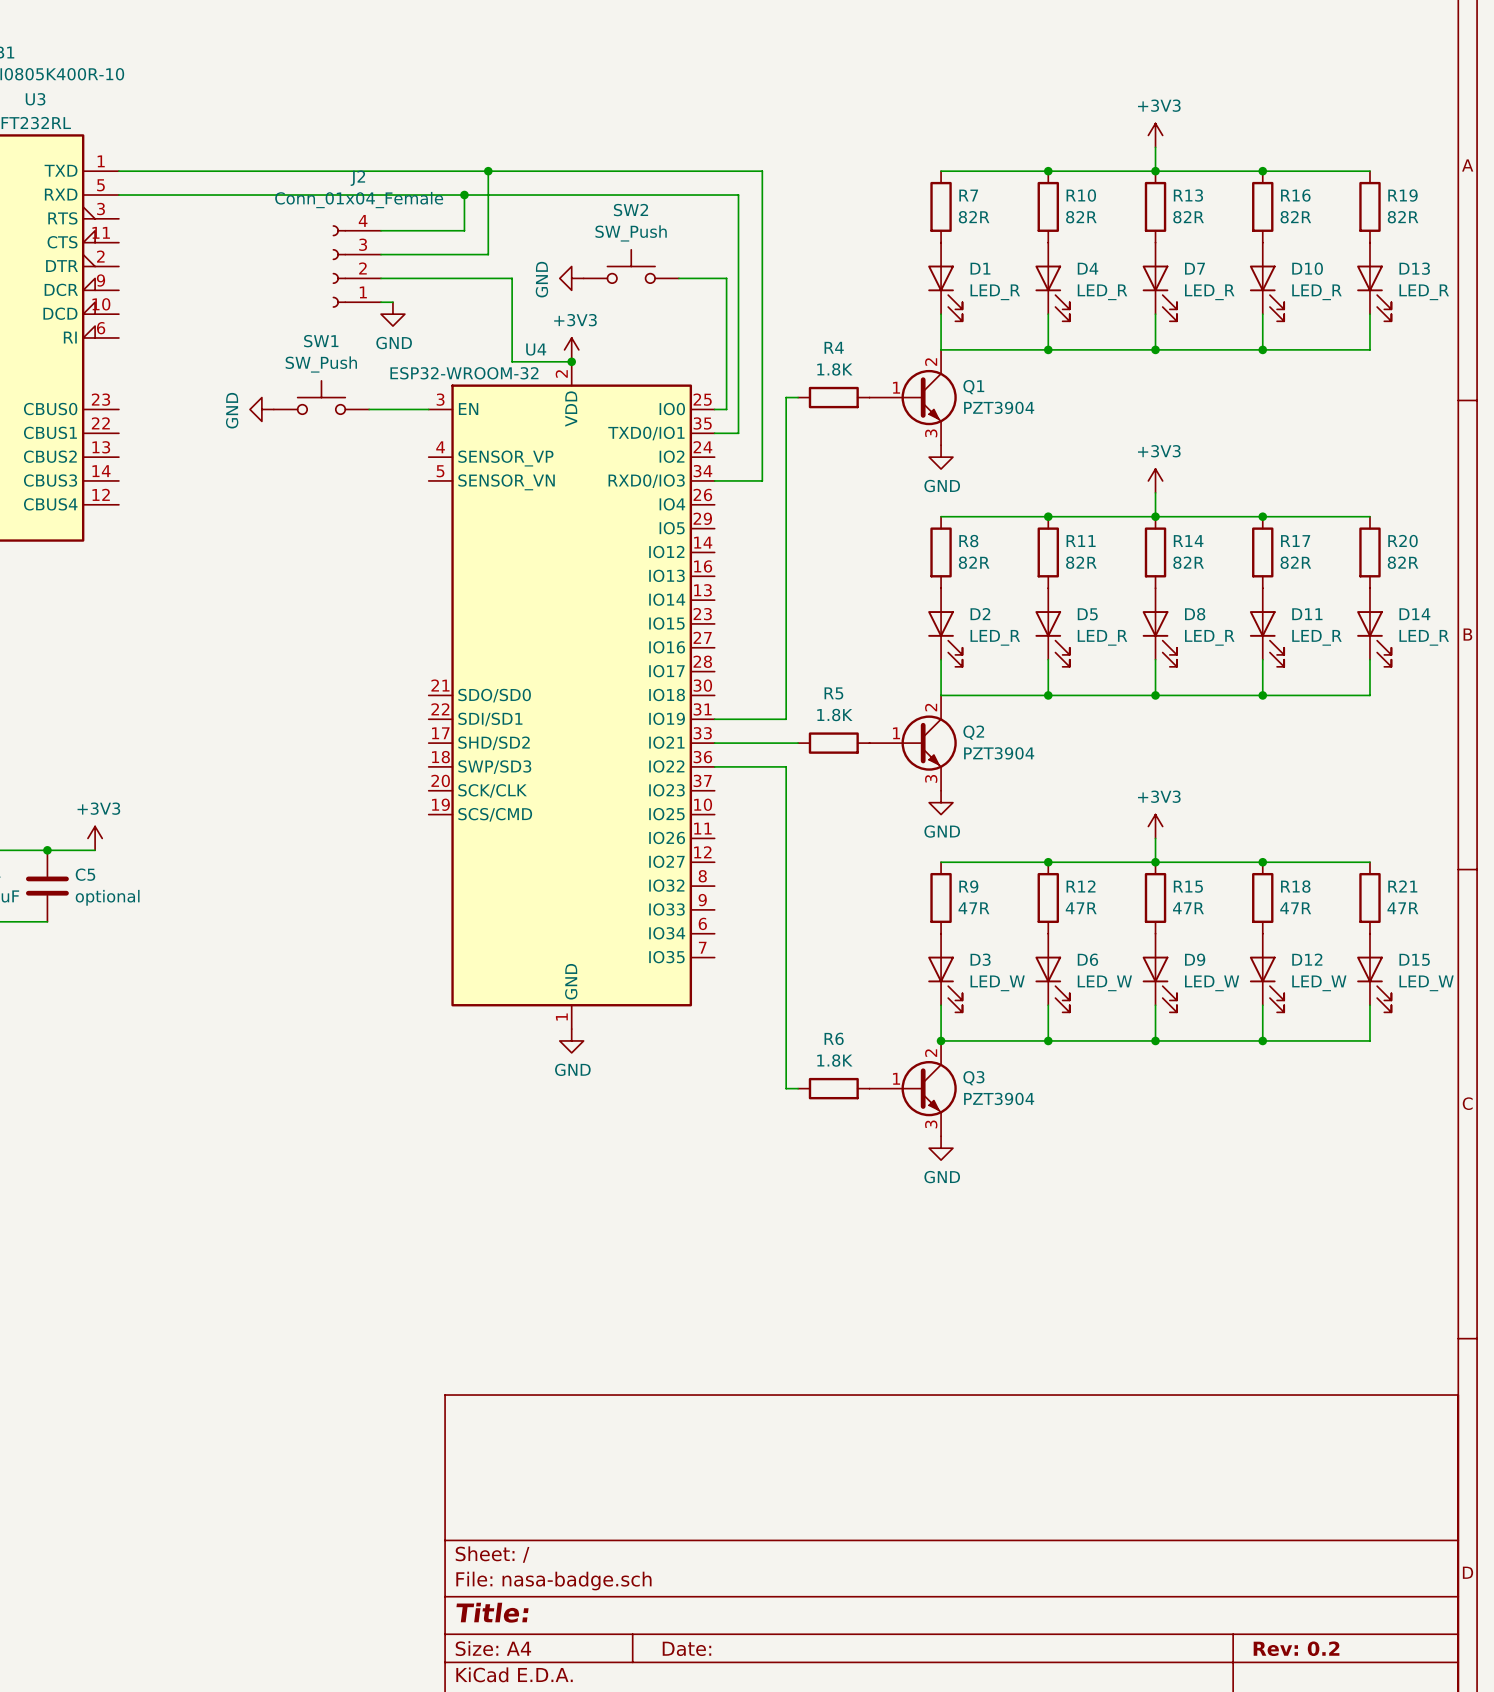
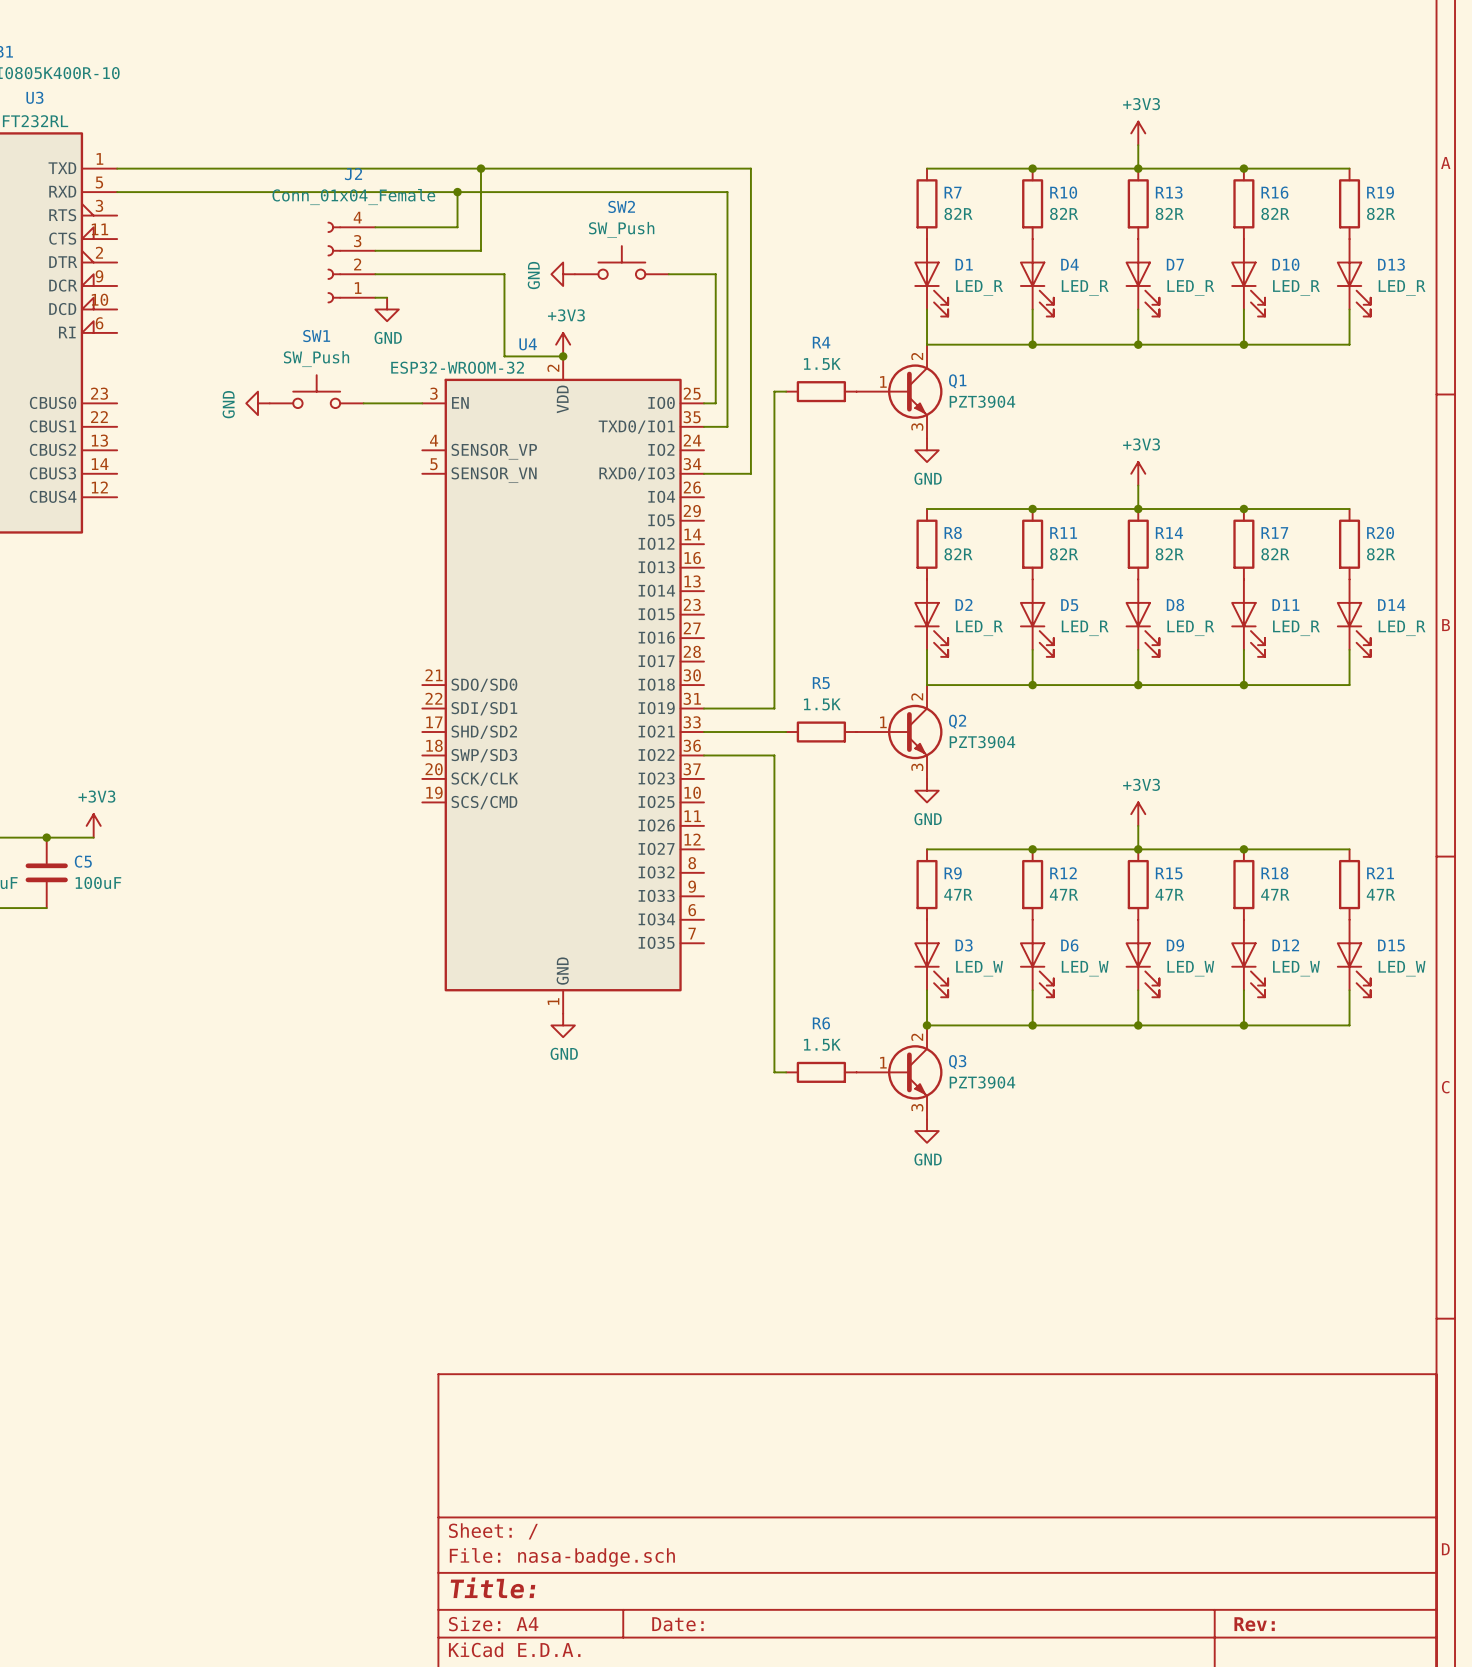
R4 value: 1.8K (834, 369) -> 1.5K (822, 364)
R5 value: 1.8K (834, 715) -> 1.5K (822, 704)
C5 value: optional (107, 897) -> 100uF (98, 882)
R6 value: 1.8K (834, 1060) -> 1.5K (822, 1044)
title block: Rev: 0.2 (1296, 1648) -> Rev: (1254, 1624)

